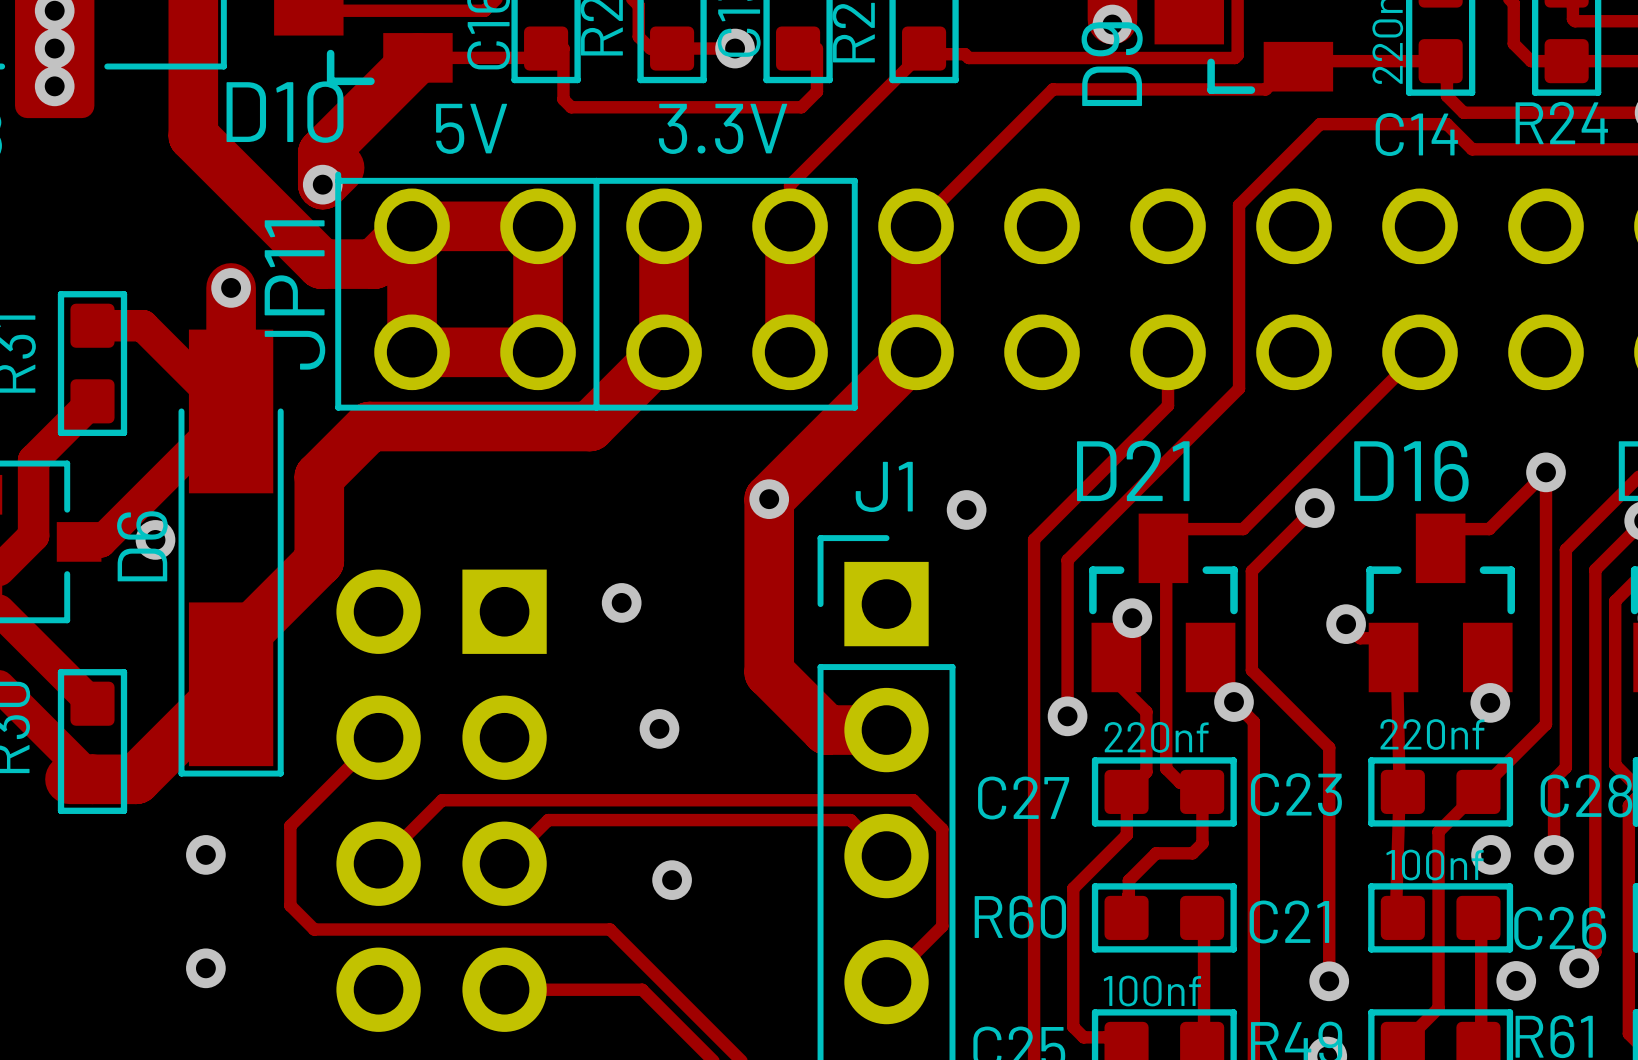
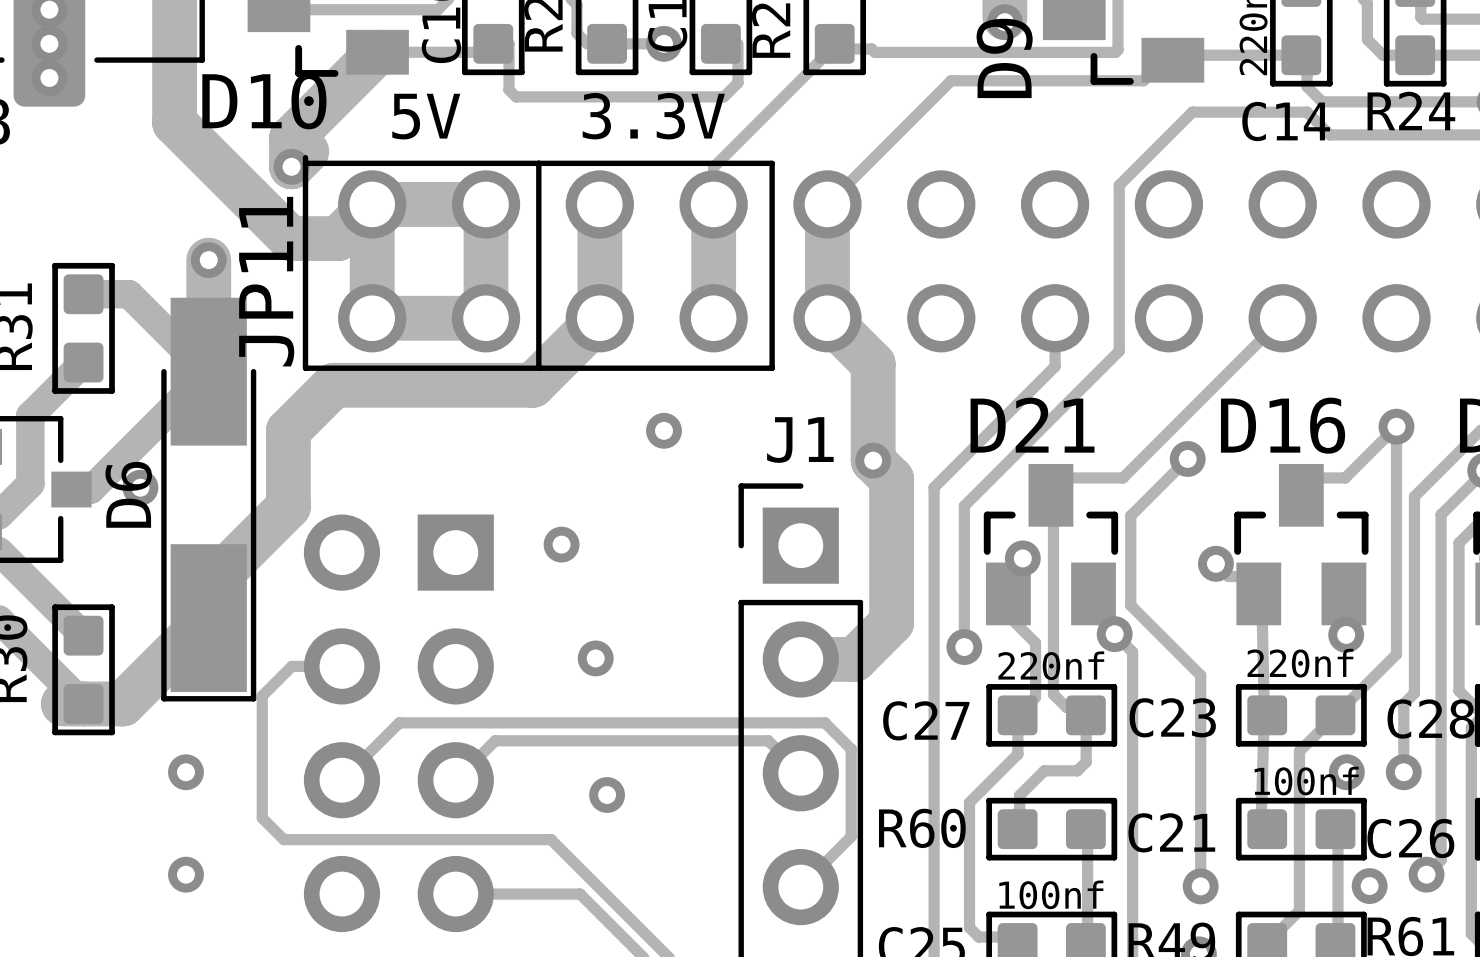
track: (916, 352) (769, 499) (769, 672) (826, 730) (886, 730) -> (827, 318) (873, 363) (873, 460) (891, 479) (891, 622) (854, 659) (800, 659)
via position: (769, 499) -> (664, 430)
track: (378, 737) (290, 825) -> (341, 666) (291, 666) (262, 695) (262, 746)

